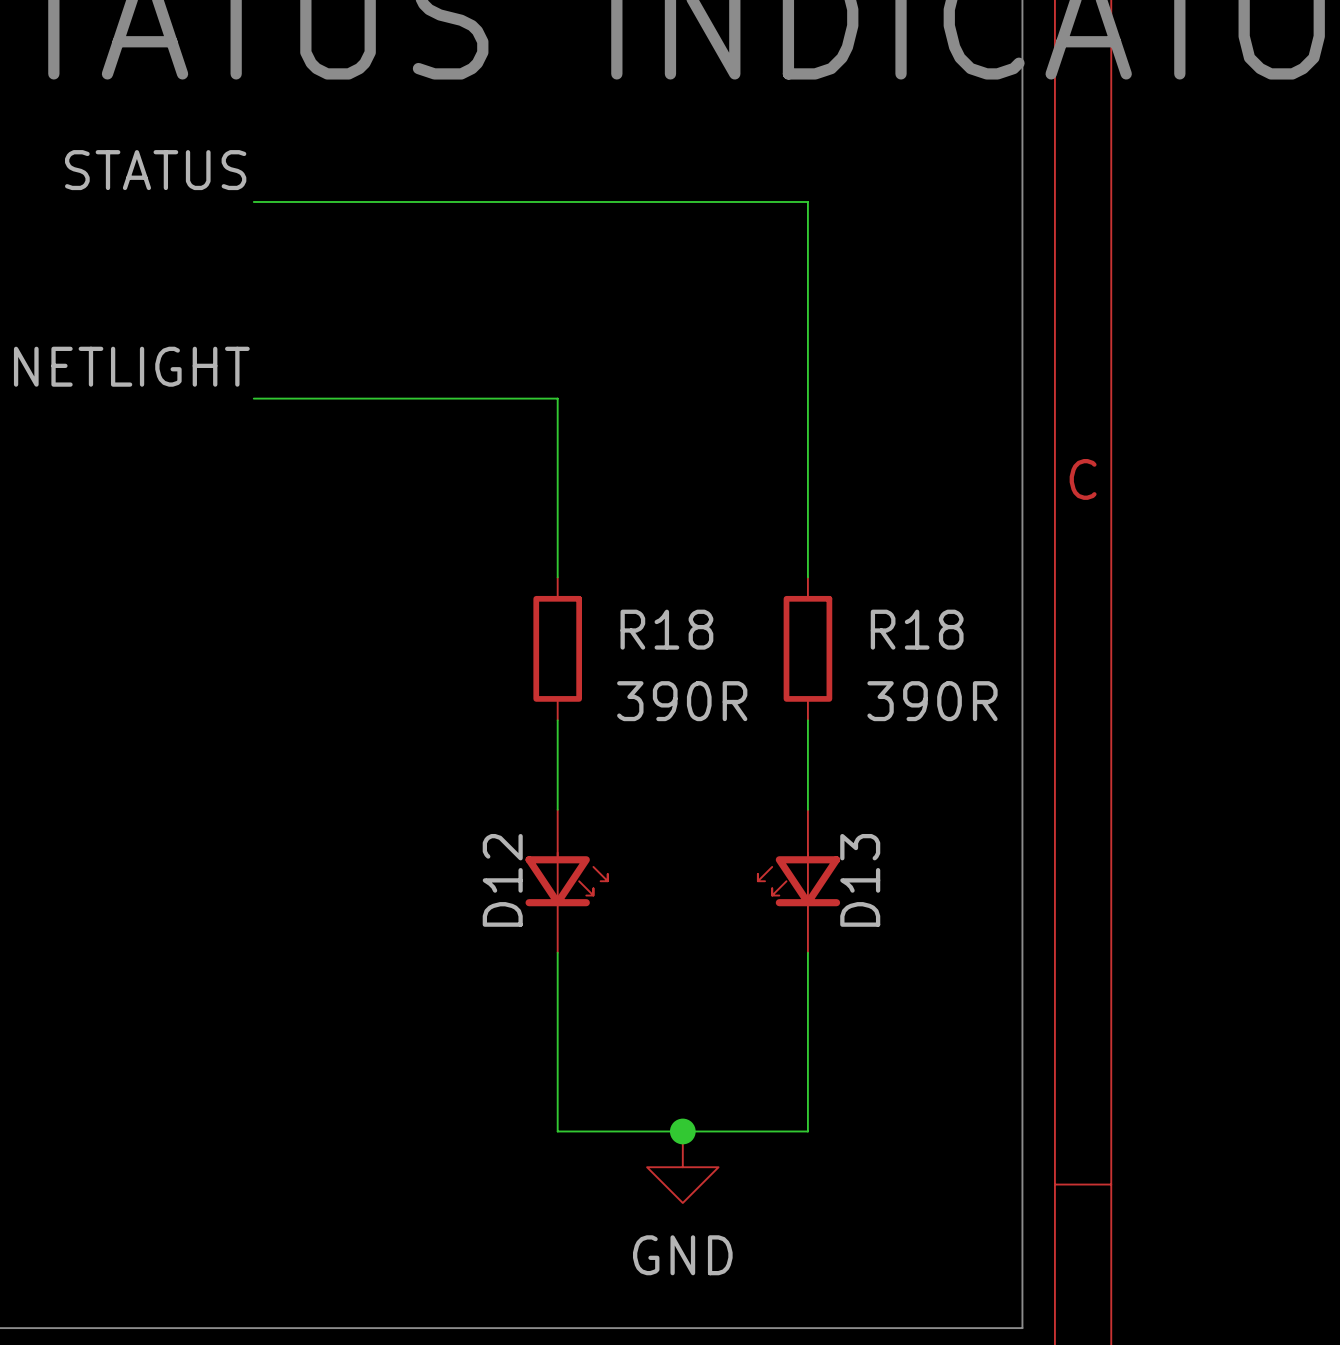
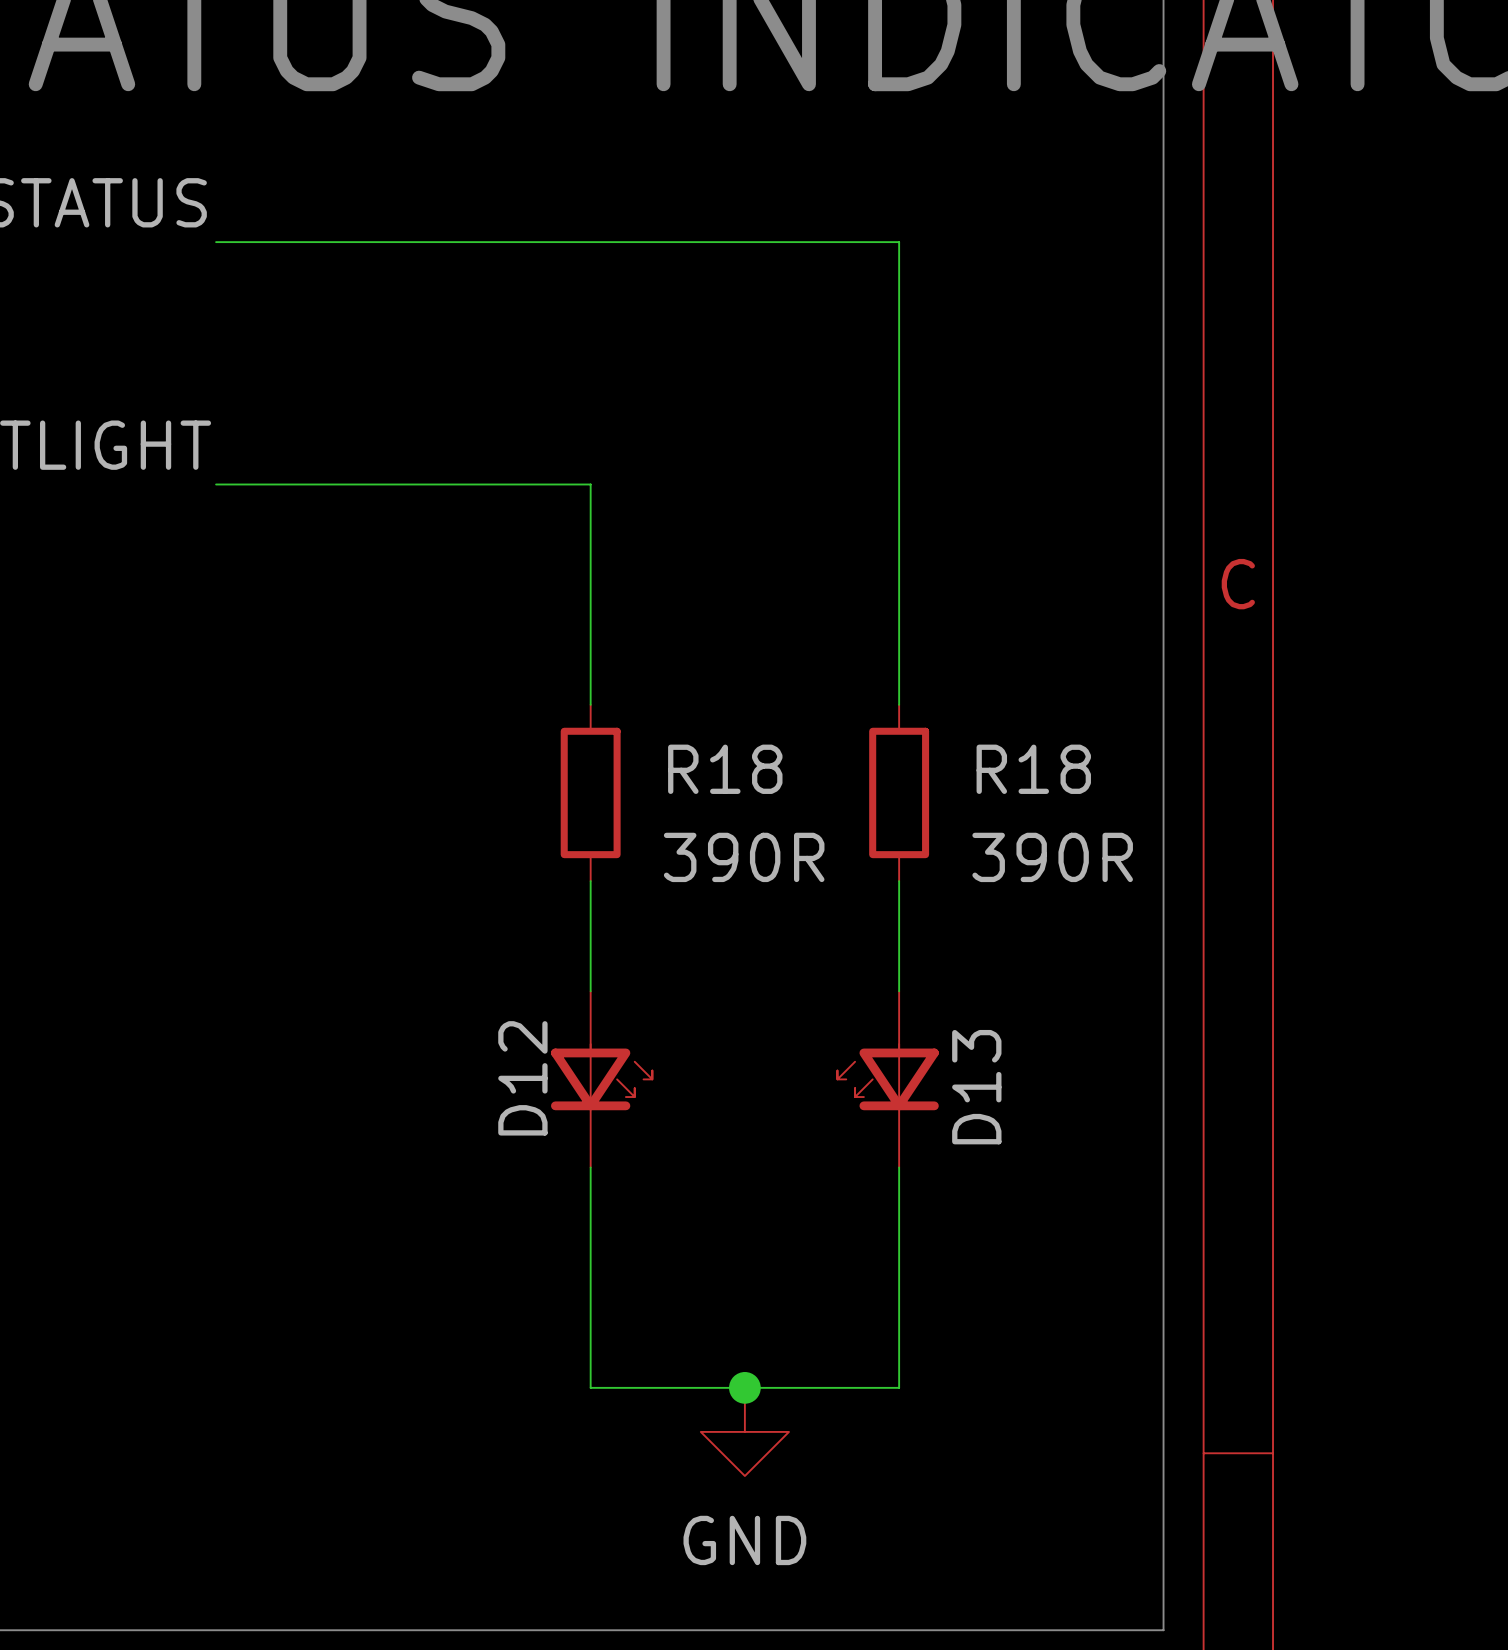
D13 name position: D13 (860, 880) -> D13 (976, 1087)

